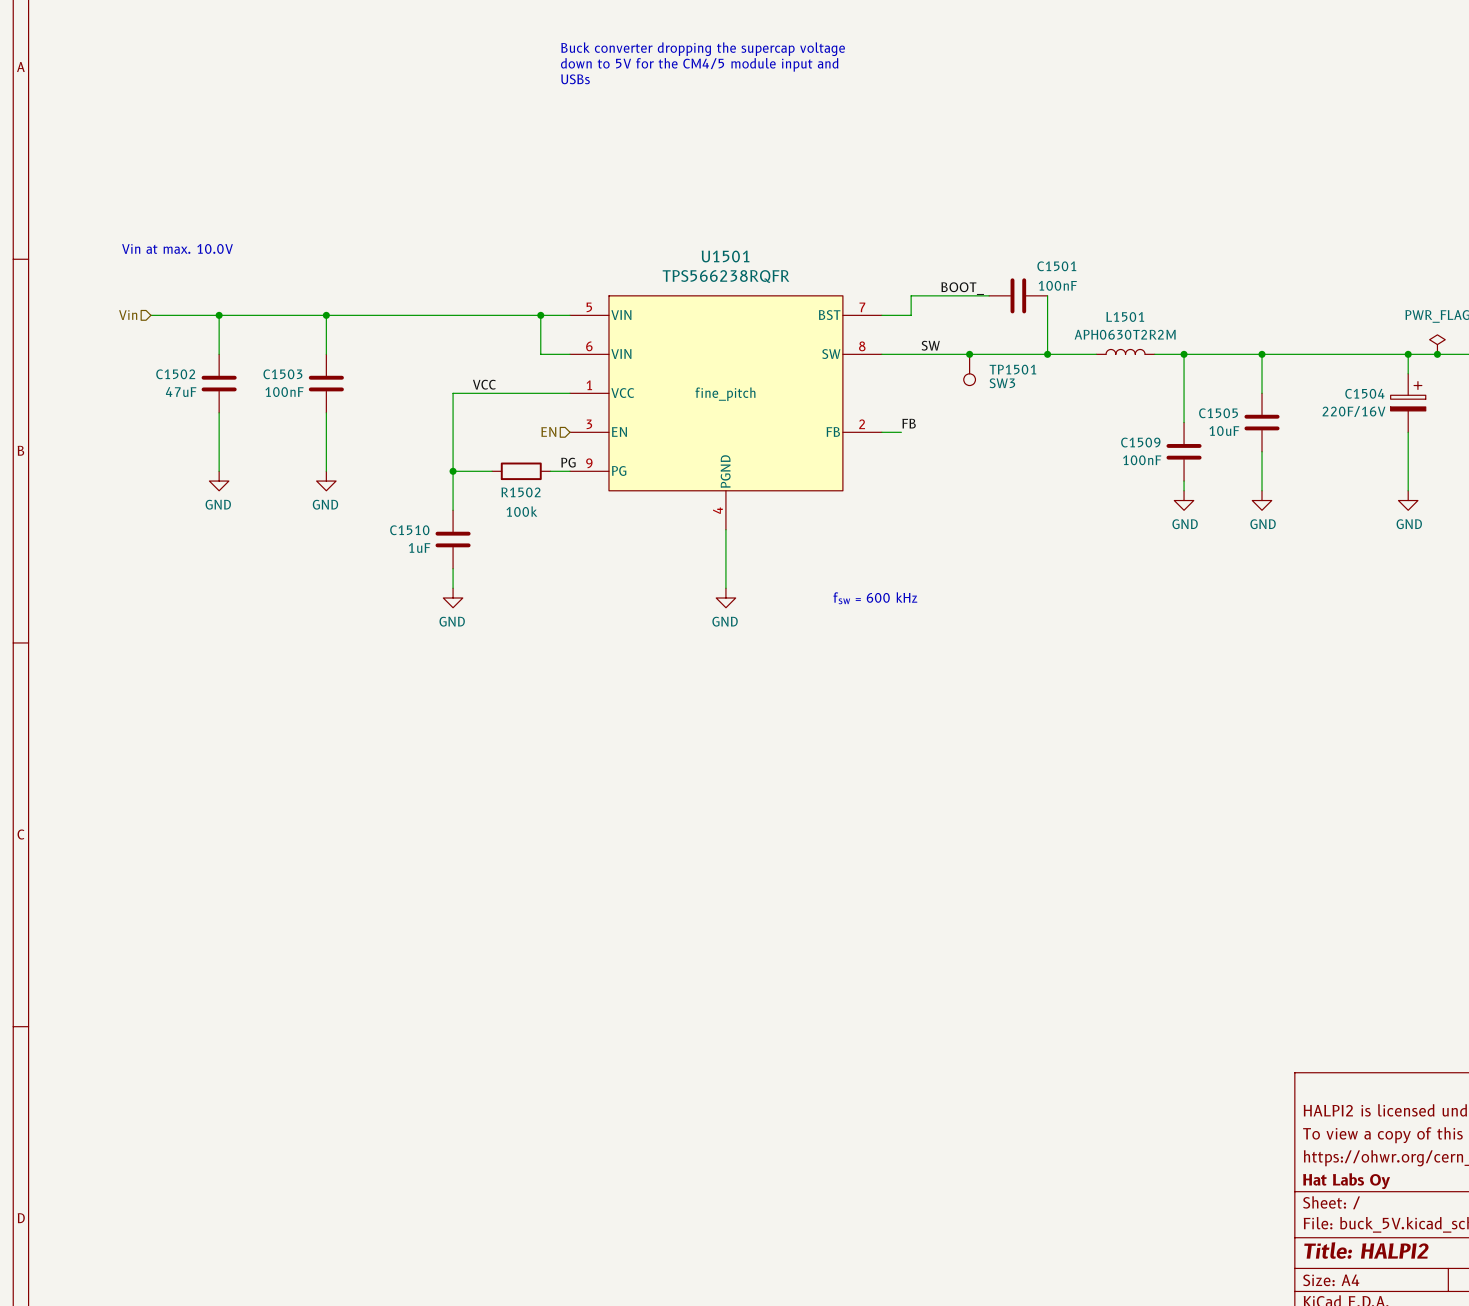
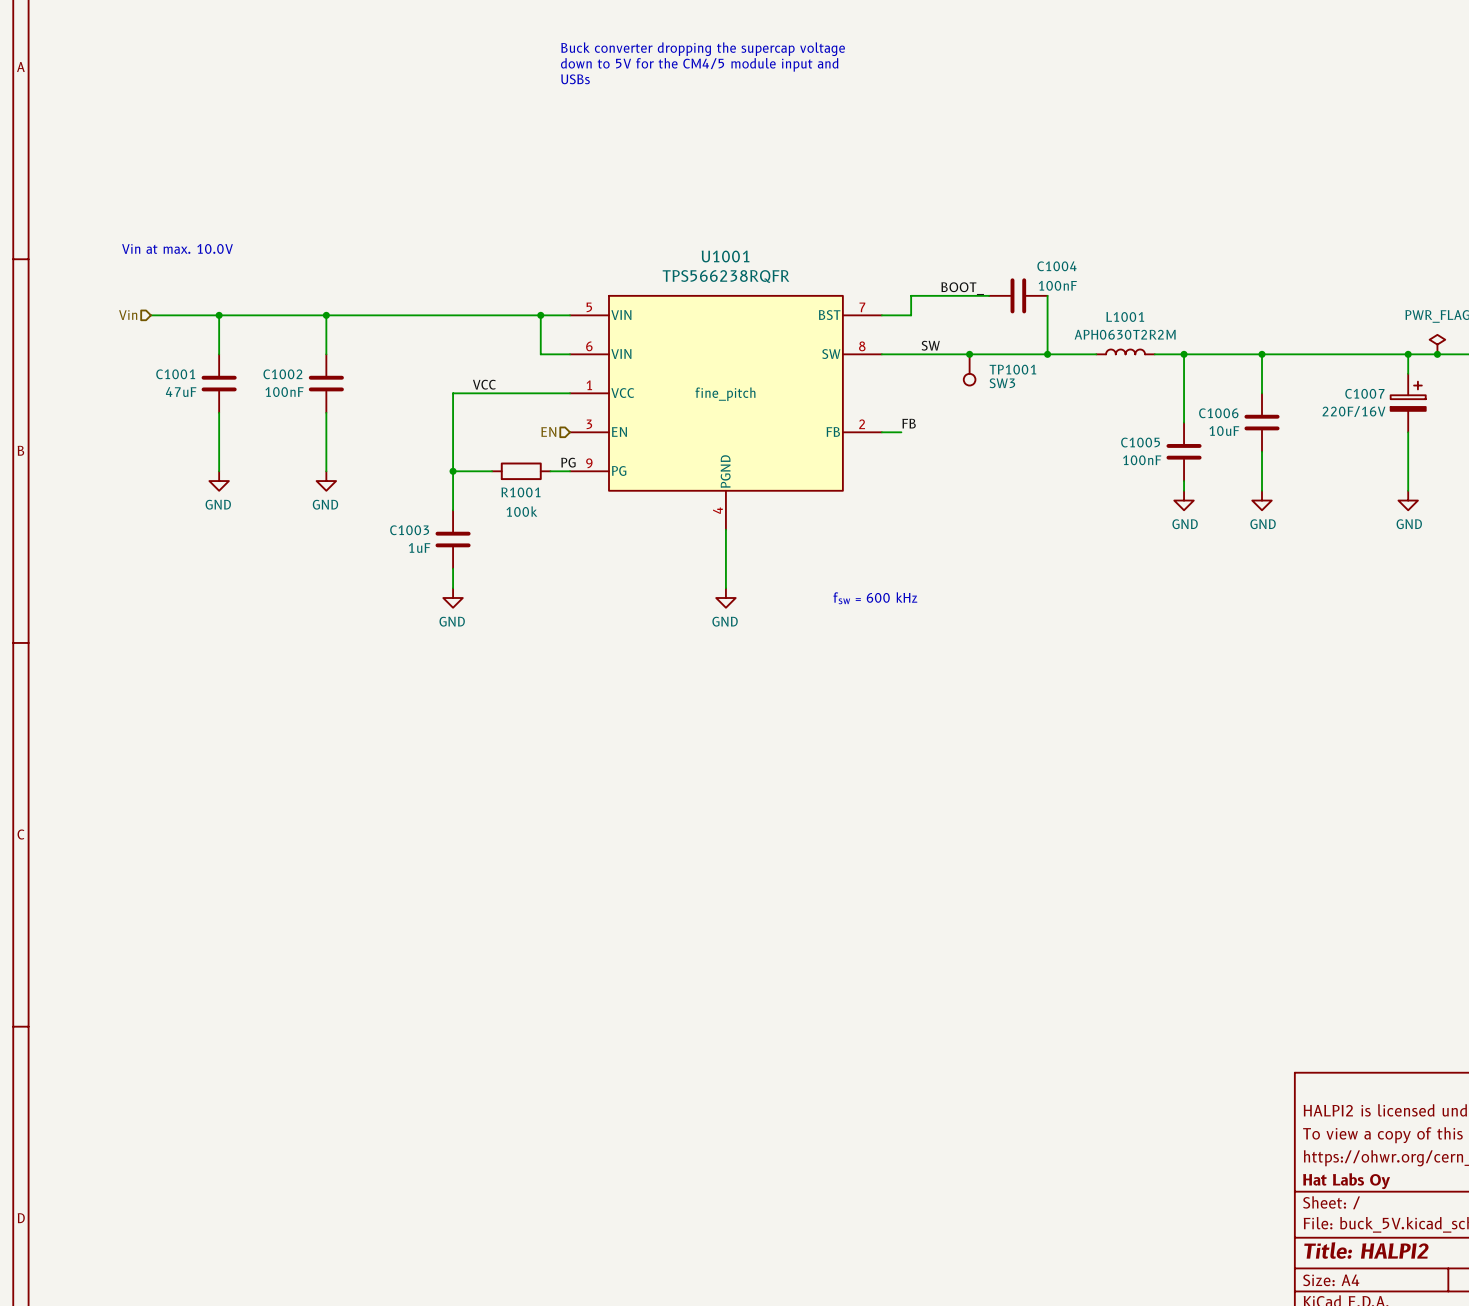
U1501 name: U1501 (725, 256) -> U1001 (725, 256)
C1501 name: C1501 (1056, 266) -> C1004 (1056, 266)
L1501 name: L1501 (1125, 316) -> L1001 (1125, 316)
TP1501 name: TP1501 (1012, 369) -> TP1001 (1012, 369)
C1502 name: C1502 (175, 374) -> C1001 (175, 374)
C1503 name: C1503 (282, 374) -> C1002 (282, 374)
C1504 name: C1504 (1364, 393) -> C1007 (1364, 393)
C1505 name: C1505 (1218, 413) -> C1006 (1218, 413)
C1509 name: C1509 (1140, 442) -> C1005 (1140, 442)
R1502 name: R1502 (520, 492) -> R1001 (520, 492)
C1510 name: C1510 (409, 530) -> C1003 (409, 530)

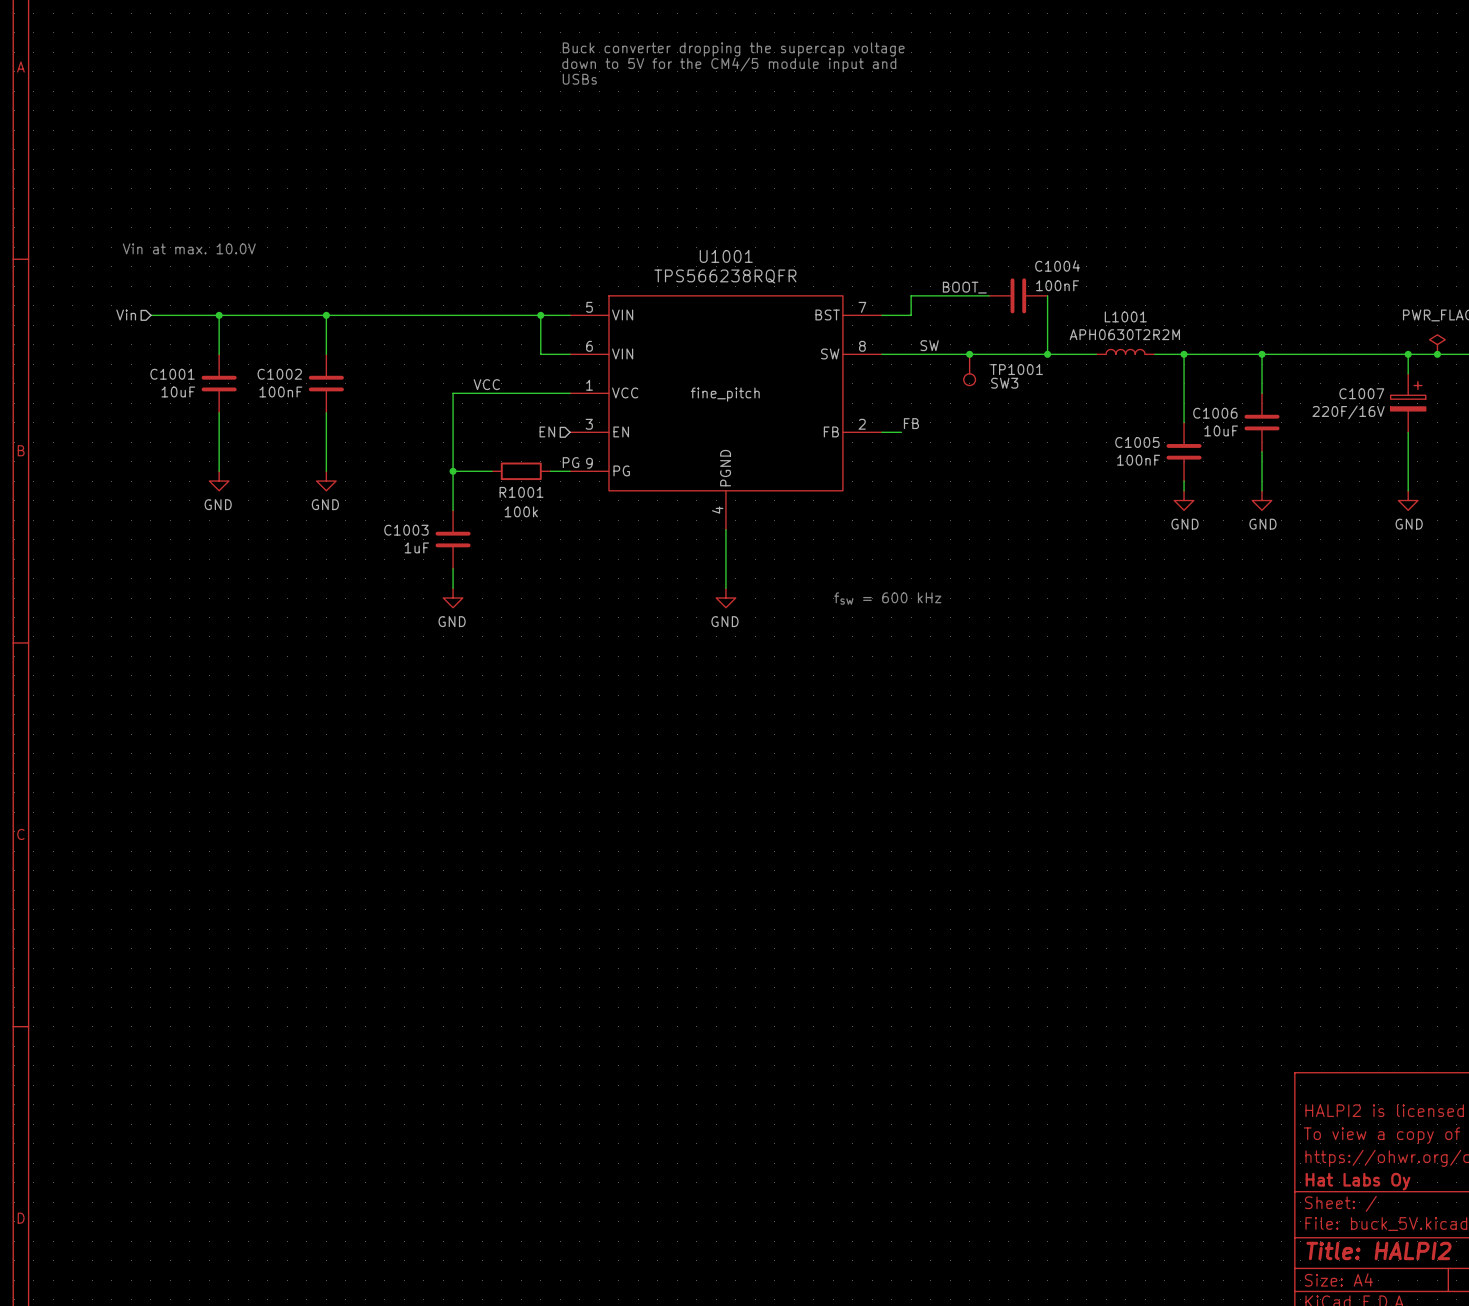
C1001 value: 47uF (181, 392) -> 10uF (178, 391)

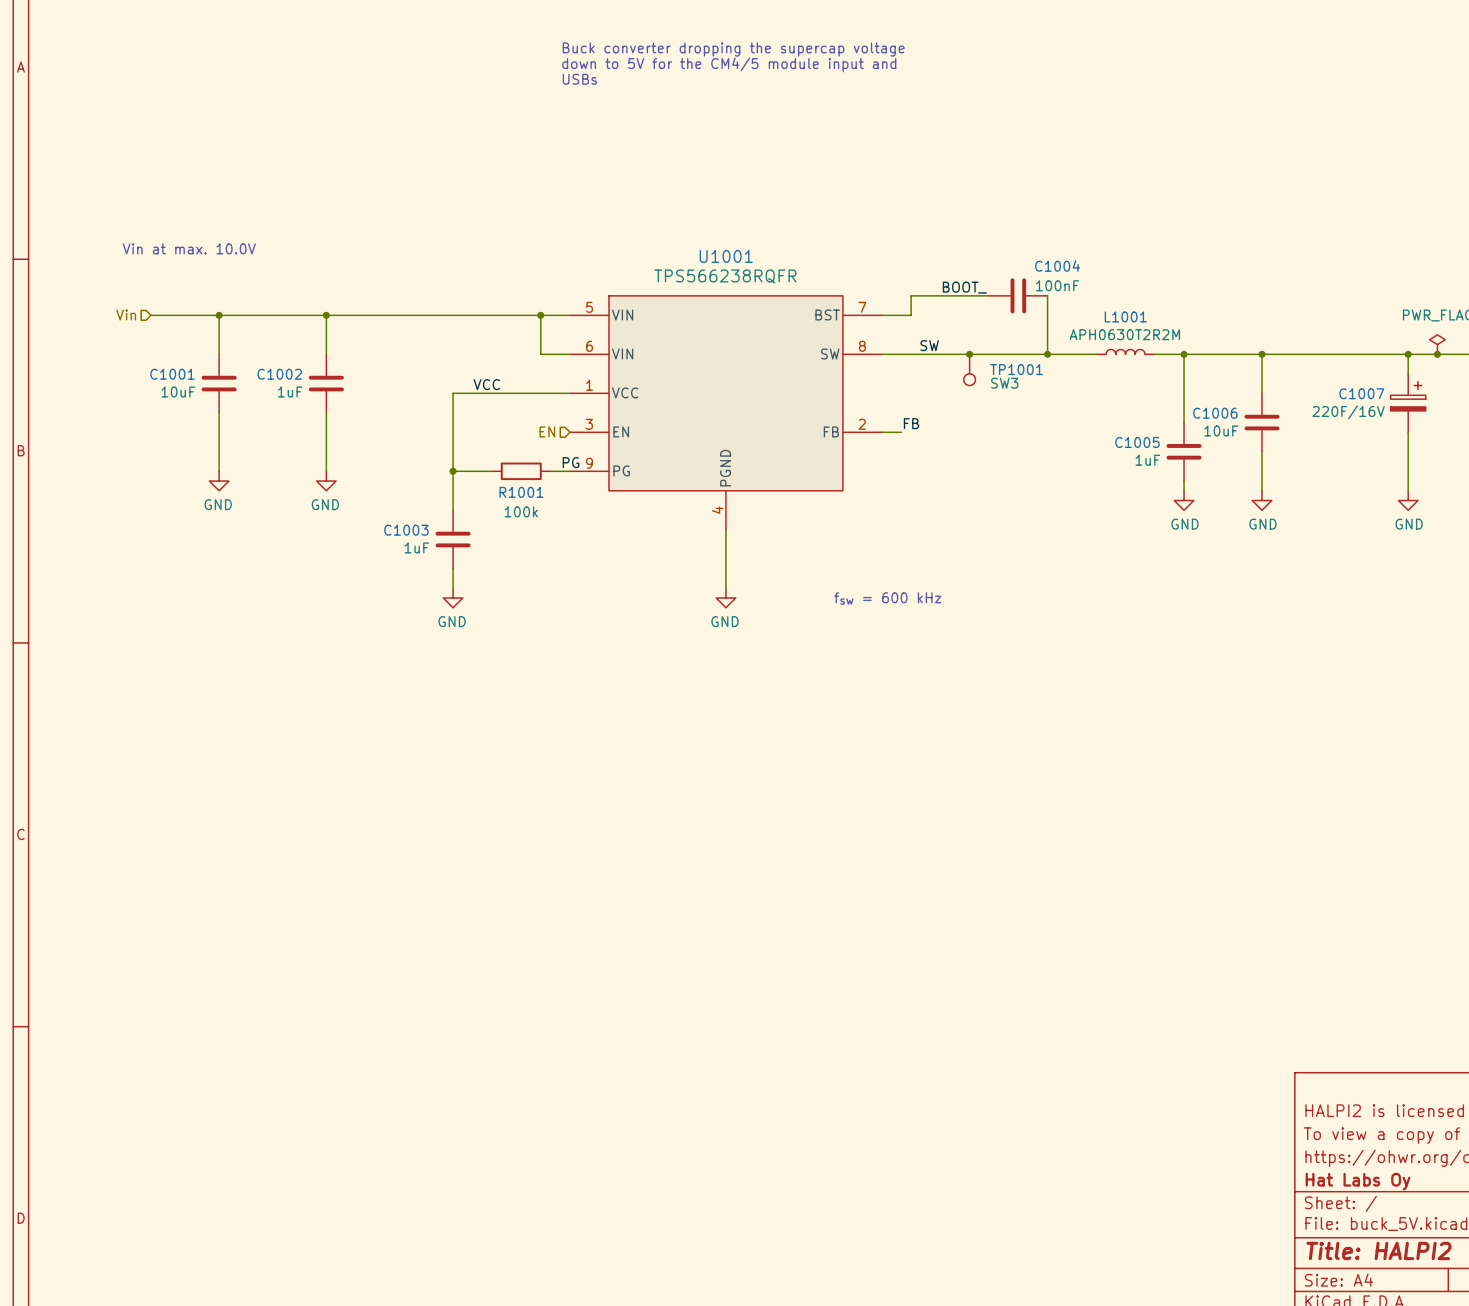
C1002 value: 100nF (280, 391) -> 1uF (290, 391)
U1001 text: fine_pitch (725, 394) -> none
C1005 value: 100nF (1138, 460) -> 1uF (1147, 460)

